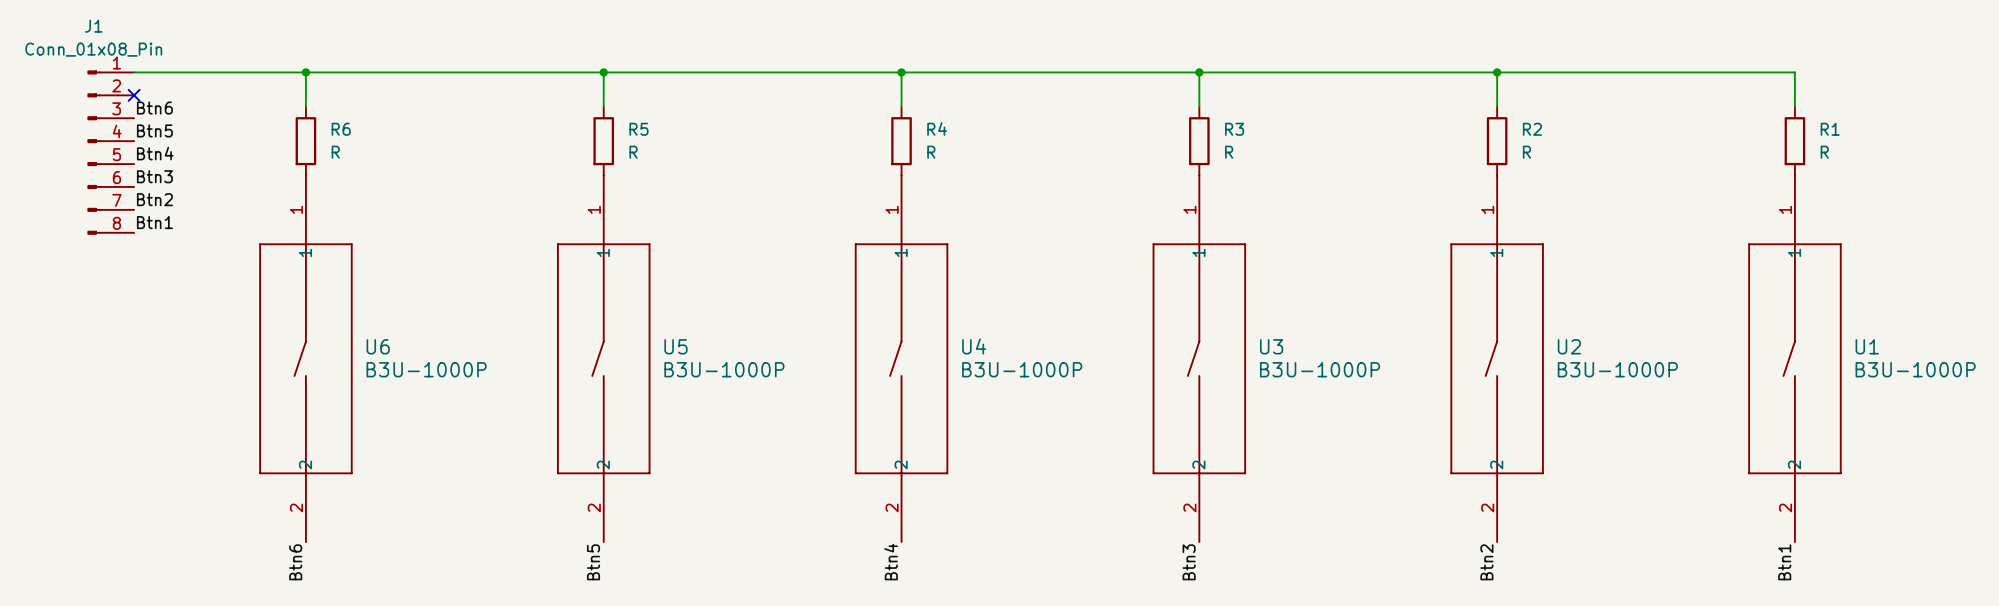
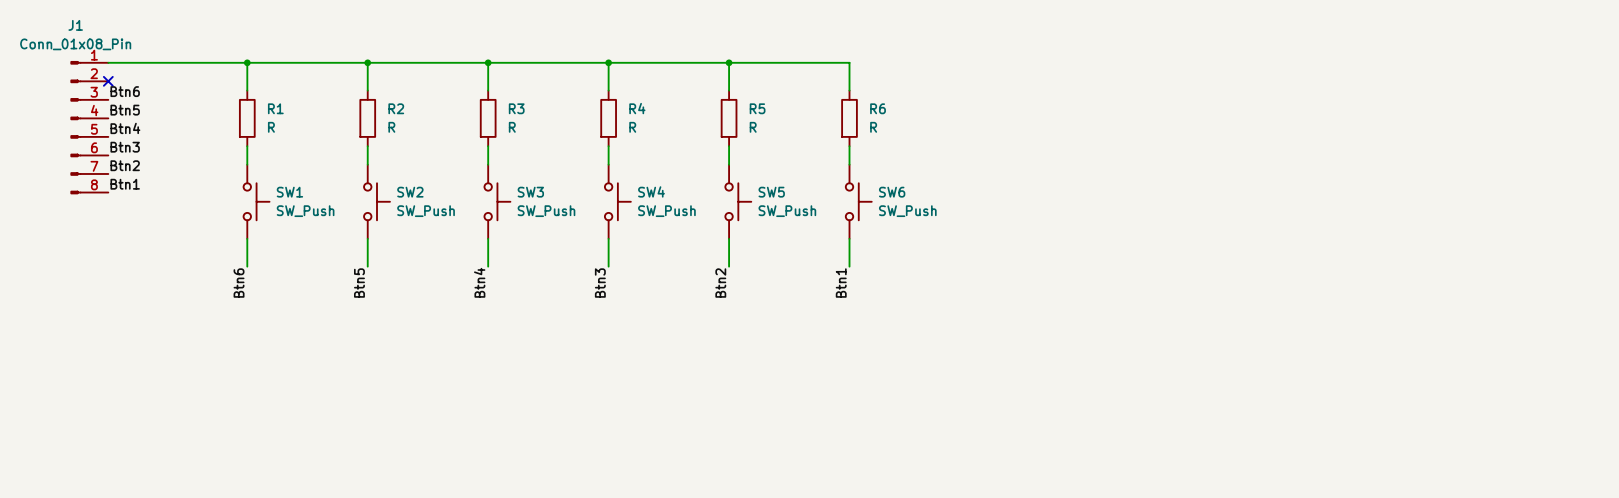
wire: none -> (367, 62) (367, 90)
junction: none -> (367, 62)
wire: none -> (608, 62) (608, 90)
junction: none -> (608, 62)
wire: (1050, 72) (1794, 72) (1794, 106) -> (849, 62) (849, 90)
wire: (1199, 72) (1199, 106) -> none
junction: (1199, 72) -> none
wire: (1497, 72) (1497, 106) -> none
junction: (1497, 72) -> none
R6 name: R6 (341, 129) -> R1 (275, 108)
R5 name: R5 (638, 129) -> R3 (516, 108)
R4 name: R4 (937, 129) -> R5 (757, 108)
R4: none -> R (608, 118)
R6: none -> R (849, 118)
R3: R (1199, 141) -> none
R2 position: (1497, 141) -> (367, 118)
R1: R (1794, 141) -> none
wire: none -> (367, 146) (367, 164)
wire: none -> (608, 146) (608, 164)
wire: none -> (849, 146) (849, 164)
SW1: none -> SW_Push (256, 201)
SW2: none -> SW_Push (377, 201)
SW3: none -> SW_Push (497, 201)
SW4: none -> SW_Push (617, 201)
SW5: none -> SW_Push (738, 201)
SW6: none -> SW_Push (858, 201)
wire: none -> (367, 238) (367, 266)
wire: none -> (608, 238) (608, 266)
wire: none -> (849, 238) (849, 266)
label: none -> Btn5 (359, 283)
label: none -> Btn4 (479, 282)
label: none -> Btn3 (600, 283)
label: none -> Btn2 (720, 283)
label: none -> Btn1 (841, 283)
U6: B3U-1000P (305, 358) -> none
U5: B3U-1000P (603, 358) -> none
U4: B3U-1000P (901, 358) -> none
U3: B3U-1000P (1199, 358) -> none
U2: B3U-1000P (1497, 358) -> none
U1: B3U-1000P (1794, 358) -> none
label position: Btn6 (295, 562) -> Btn6 (239, 283)
label: Btn5 (593, 562) -> none
label: Btn4 (891, 562) -> none
label: Btn3 (1189, 562) -> none
label: Btn2 (1486, 562) -> none
label: Btn1 (1784, 562) -> none

